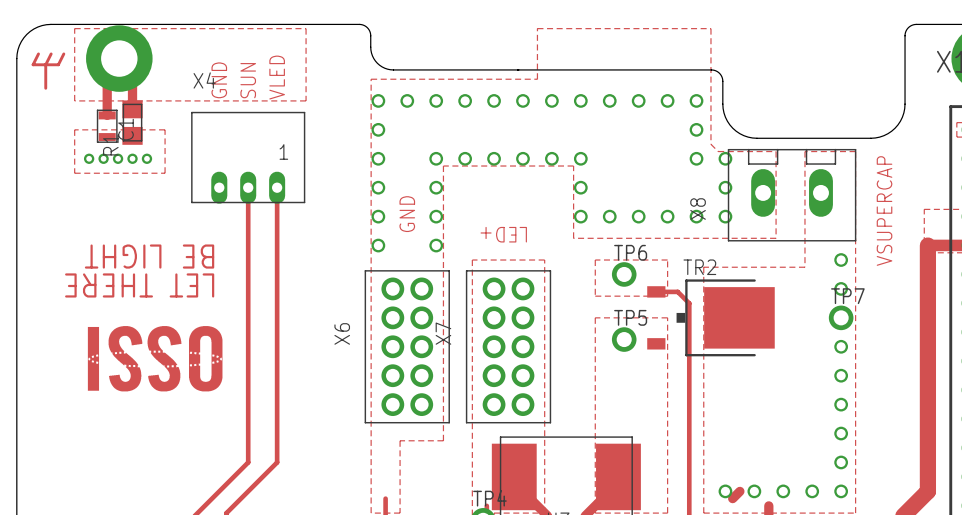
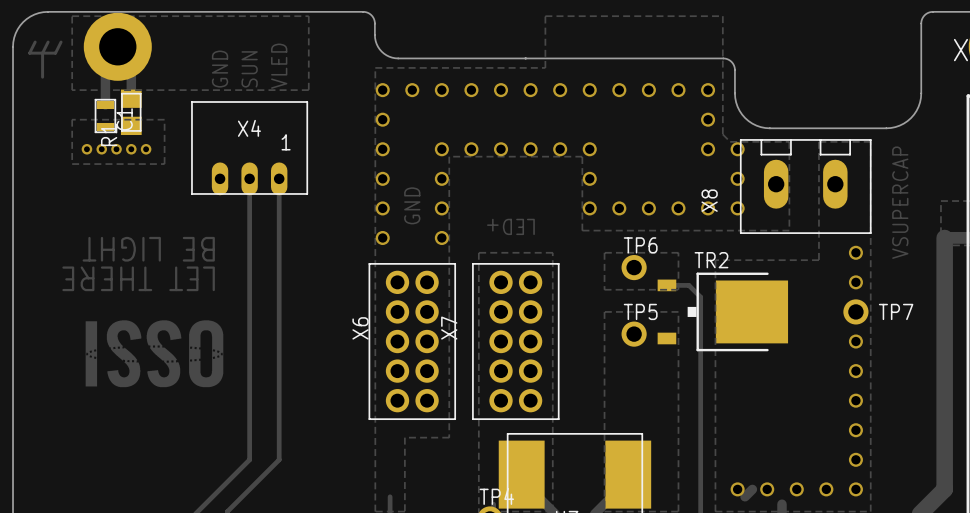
X4 name position: X4 (204, 80) -> X4 (249, 128)
TP7 name position: TP7 (847, 296) -> TP7 (896, 311)
X6 name position: X6 (342, 333) -> X6 (360, 328)

